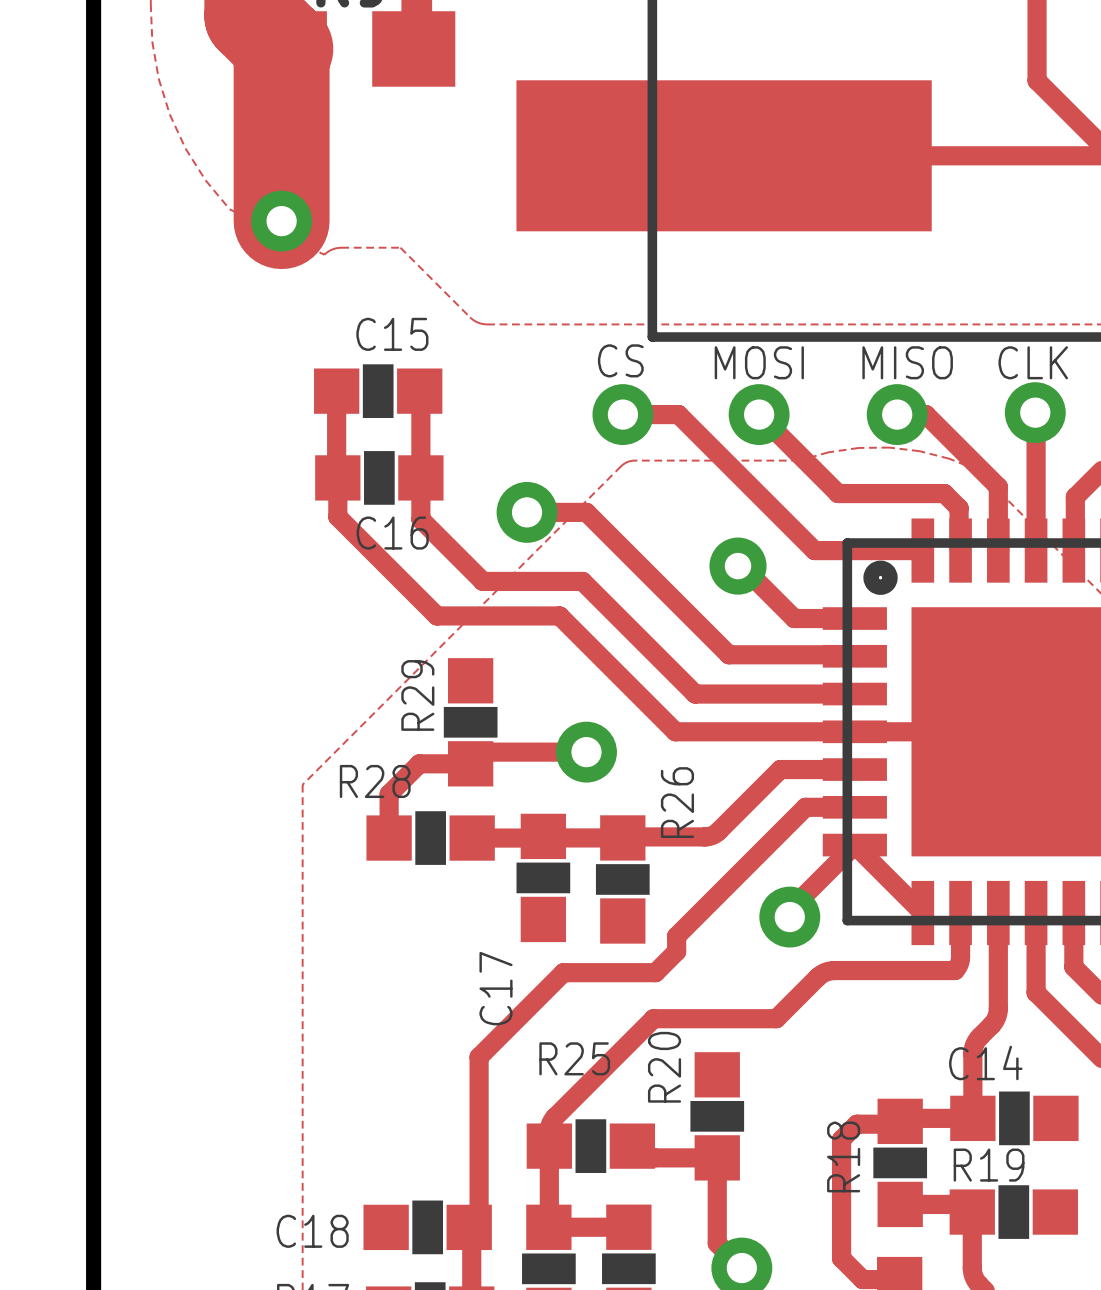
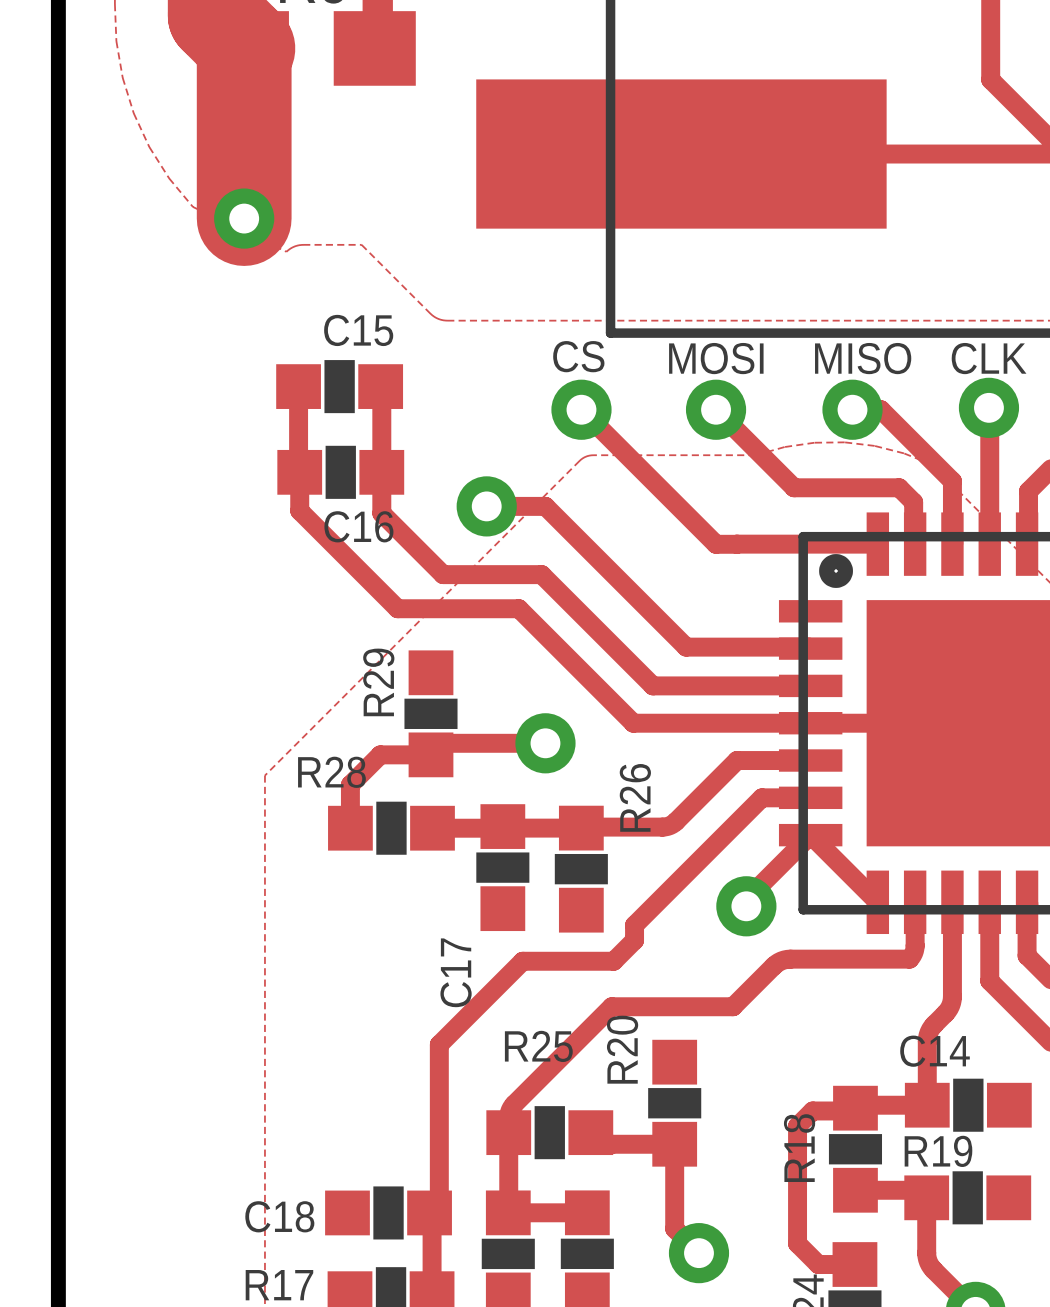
track: (622, 414) (678, 414) (814, 550) -> (581, 409) (716, 544) (736, 544)
track: none -> (737, 544) (770, 544)
track: (738, 566) (741, 566) (794, 618) (854, 618) -> none
via: (738, 566) -> none

